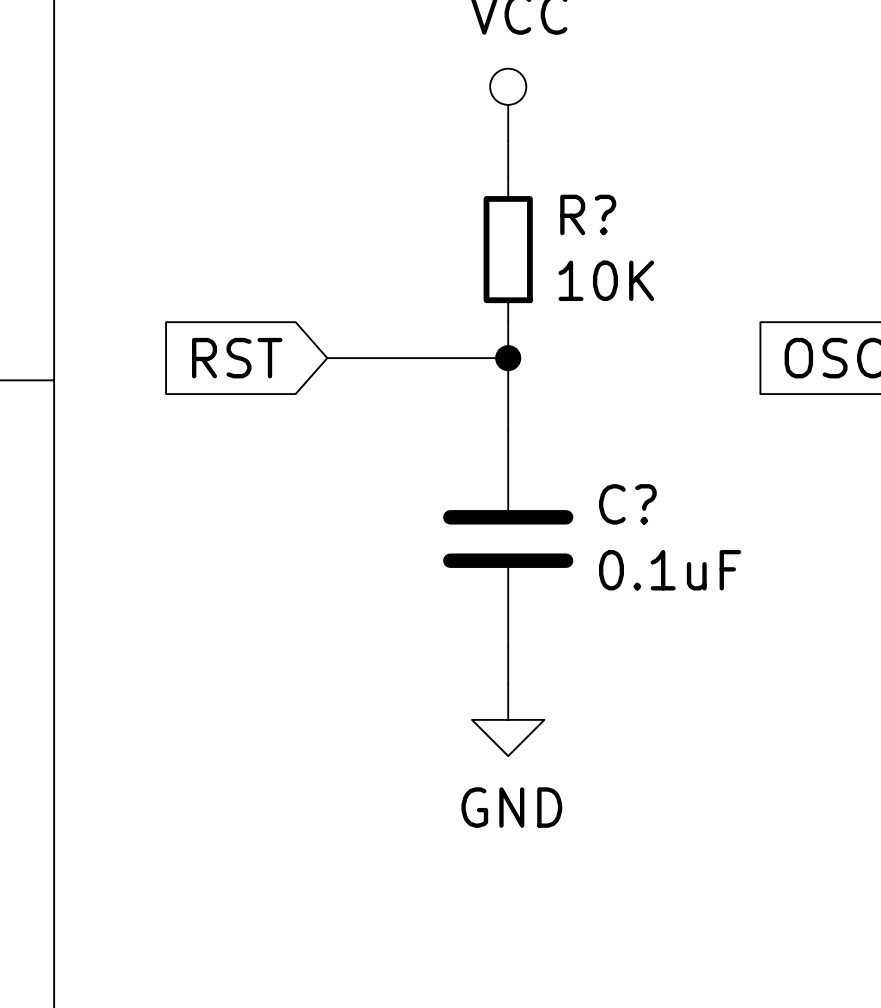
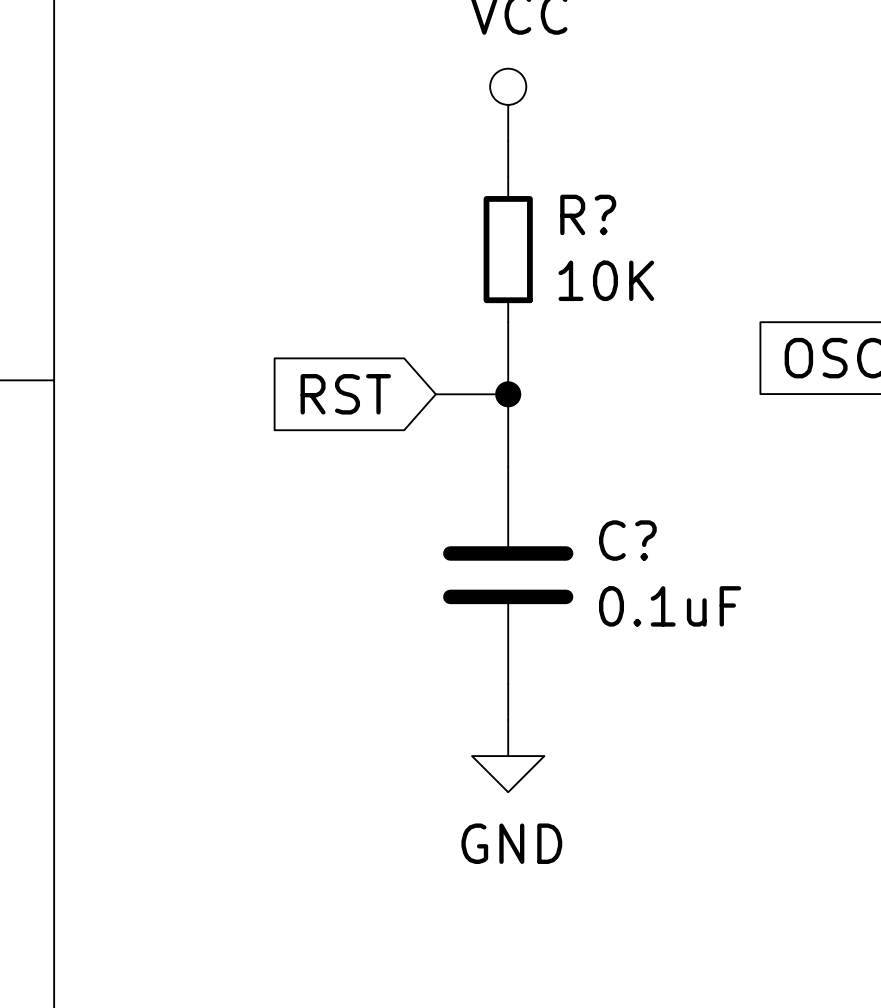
global label position: RST (237, 358) -> RST (345, 394)
wire: (327, 358) (508, 358) -> none
junction position: (508, 358) -> (508, 394)
wire: none -> (435, 394) (508, 394)
C? position: (508, 539) -> (508, 575)
power symbol position: GND (508, 719) -> GND (508, 756)

